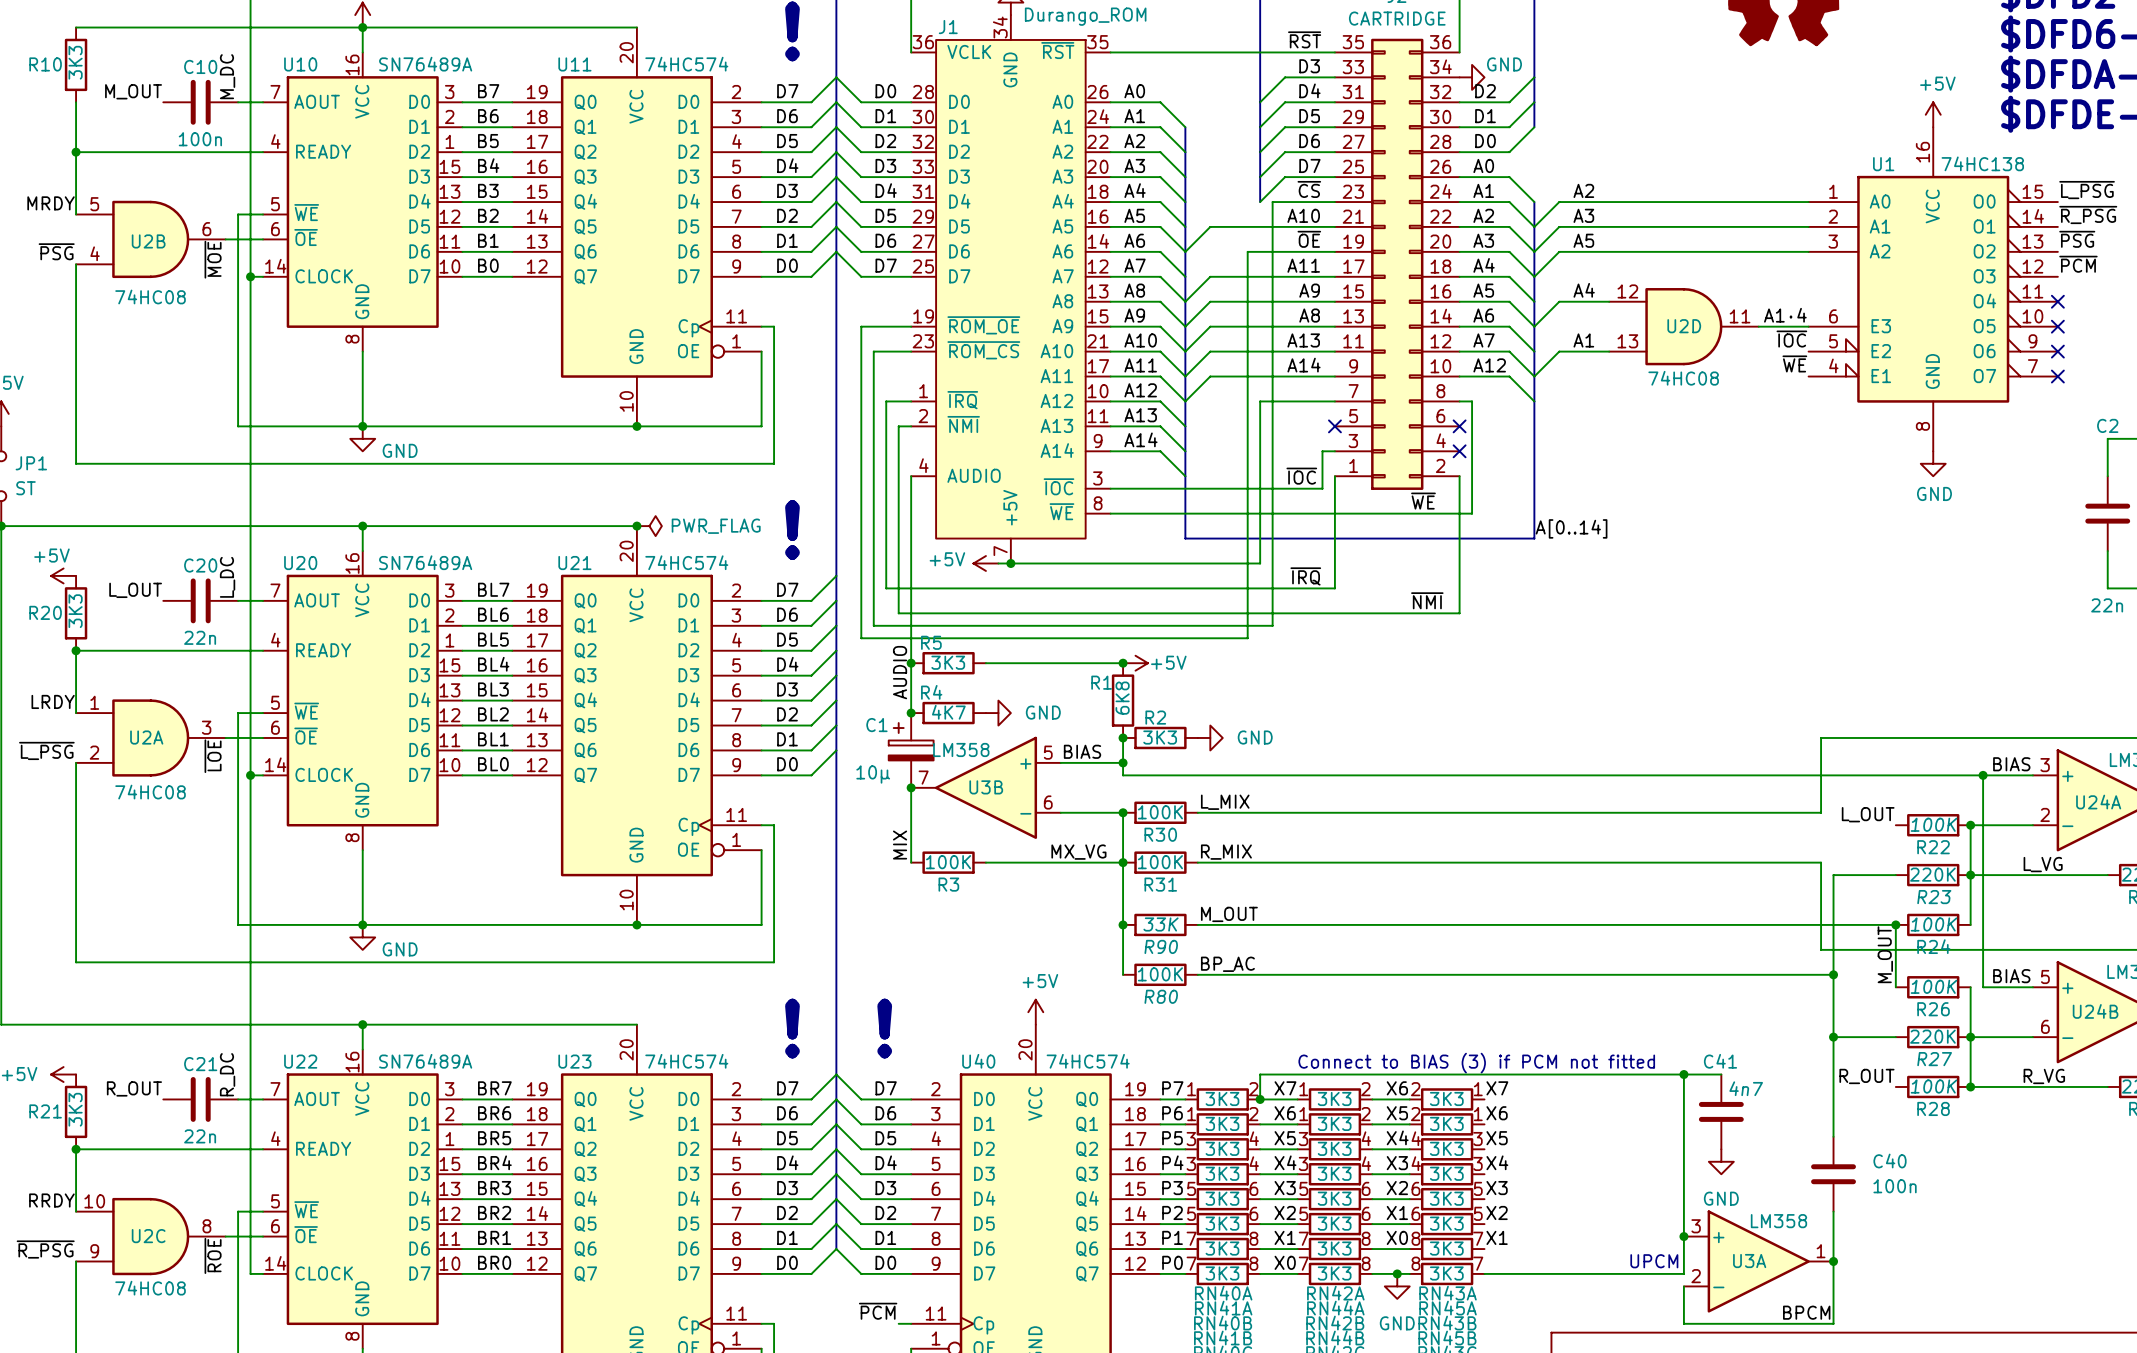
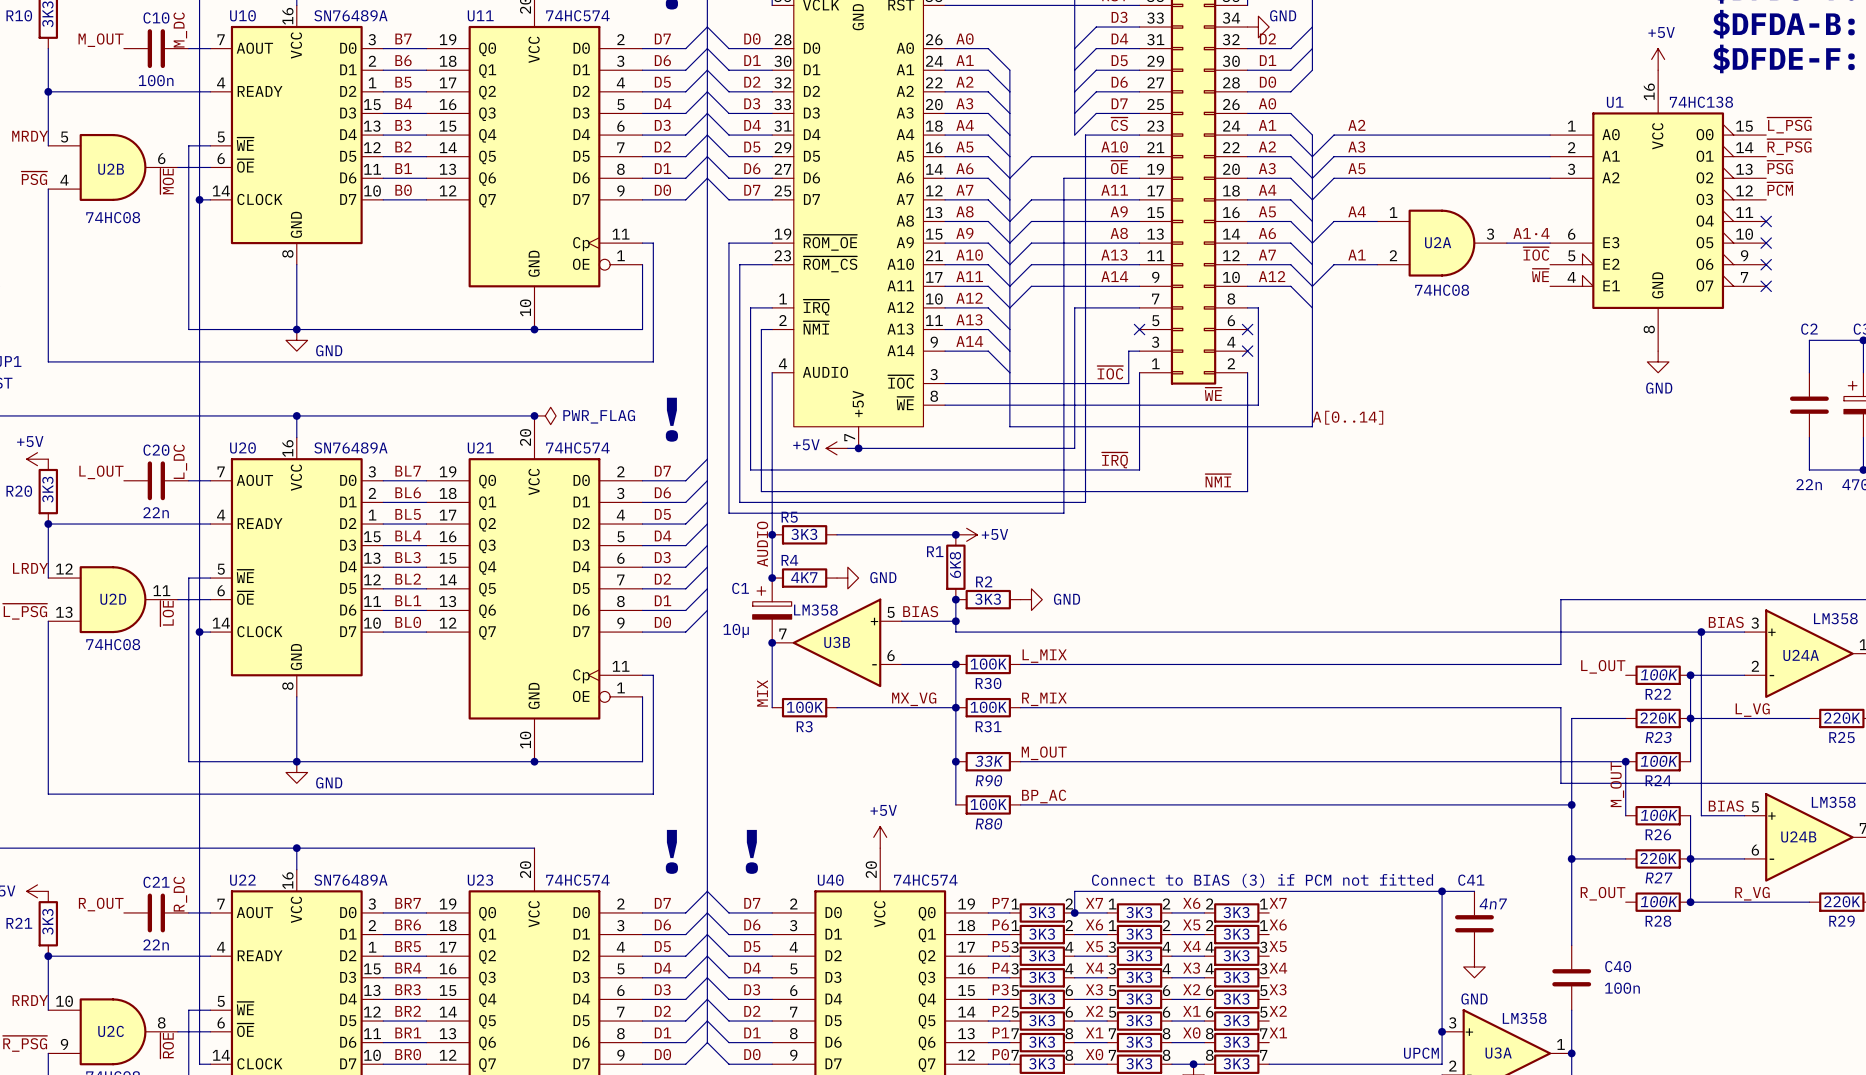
U2D position: (1683, 326) -> (113, 599)
U2A position: (150, 737) -> (1442, 243)

